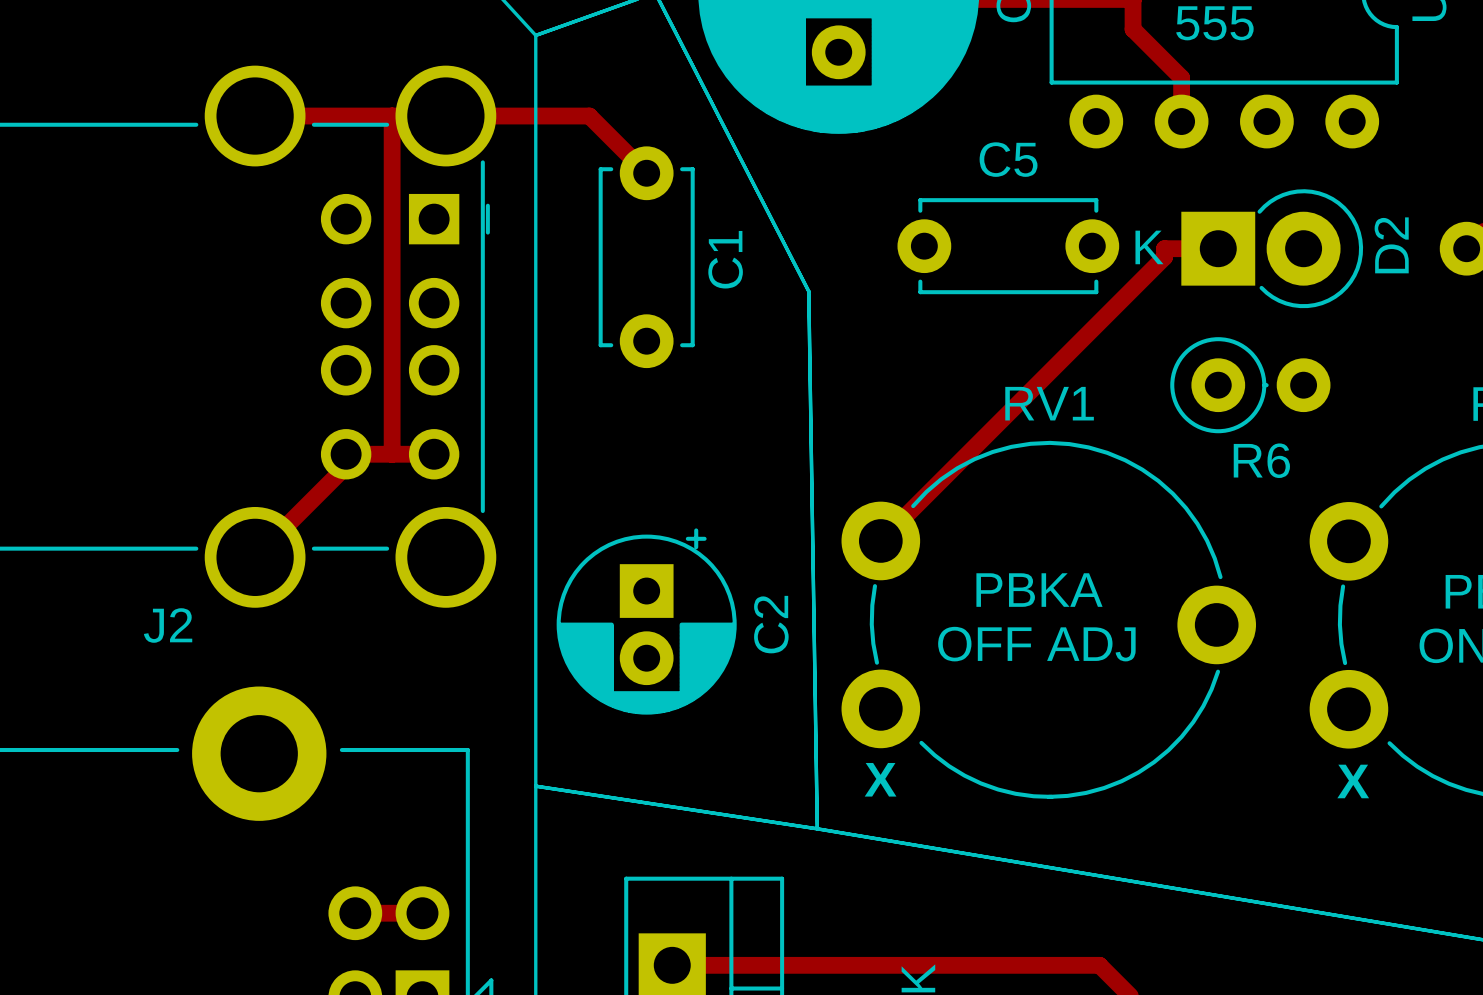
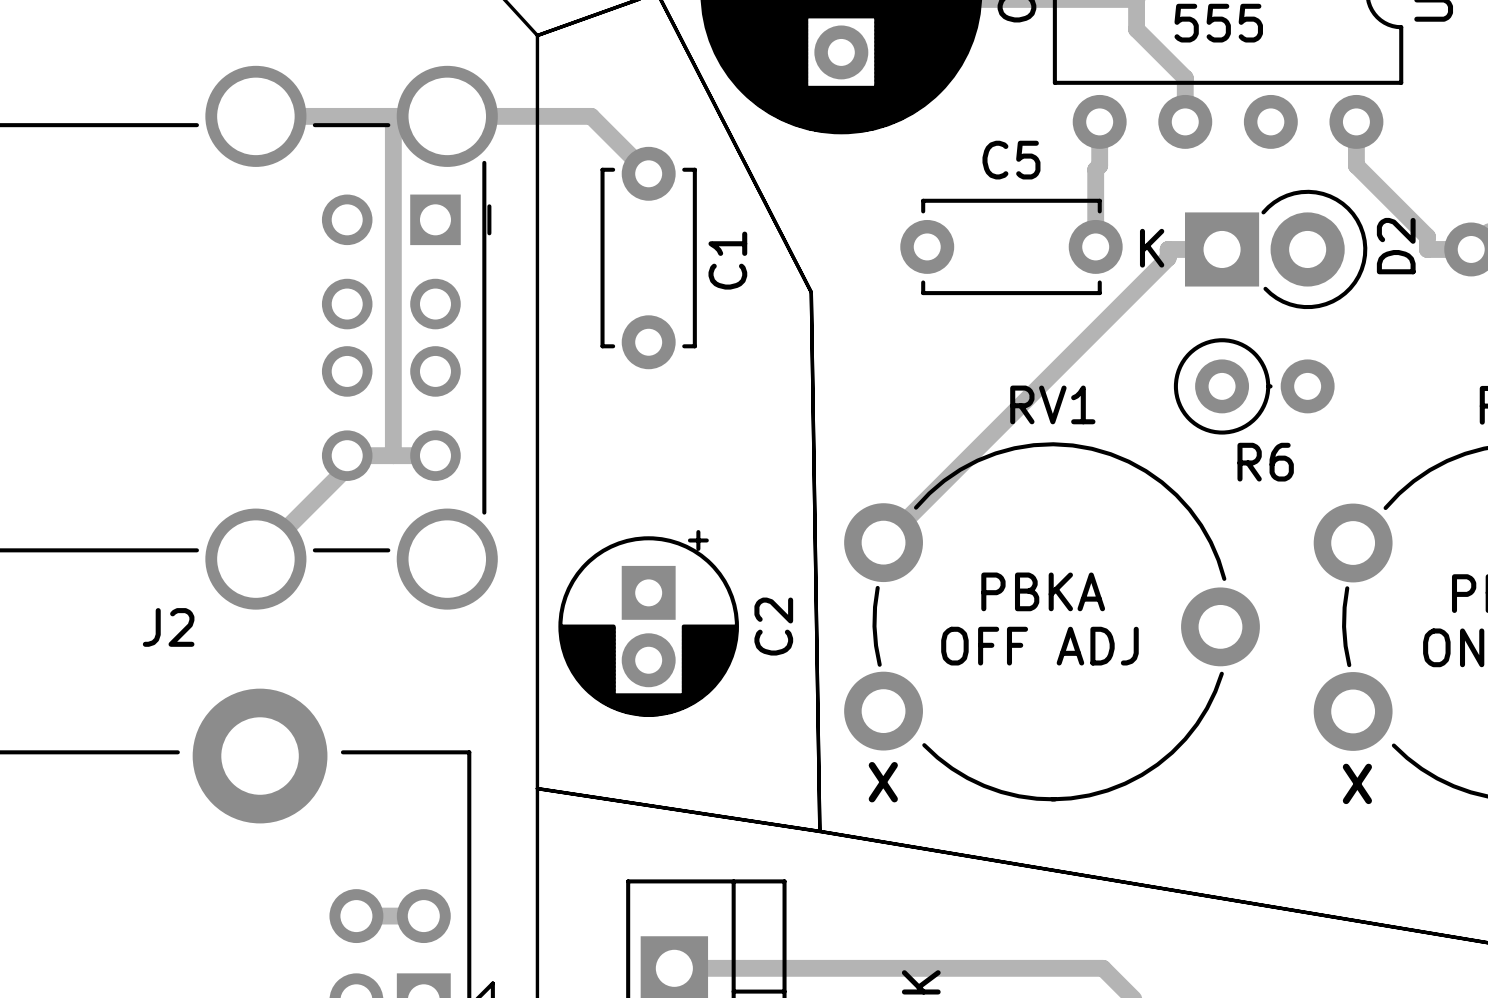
track: none -> (1099, 121) (1099, 165) (1095, 169) (1095, 246)
track: none -> (1356, 121) (1356, 165) (1427, 236) (1427, 249) (1471, 249)

